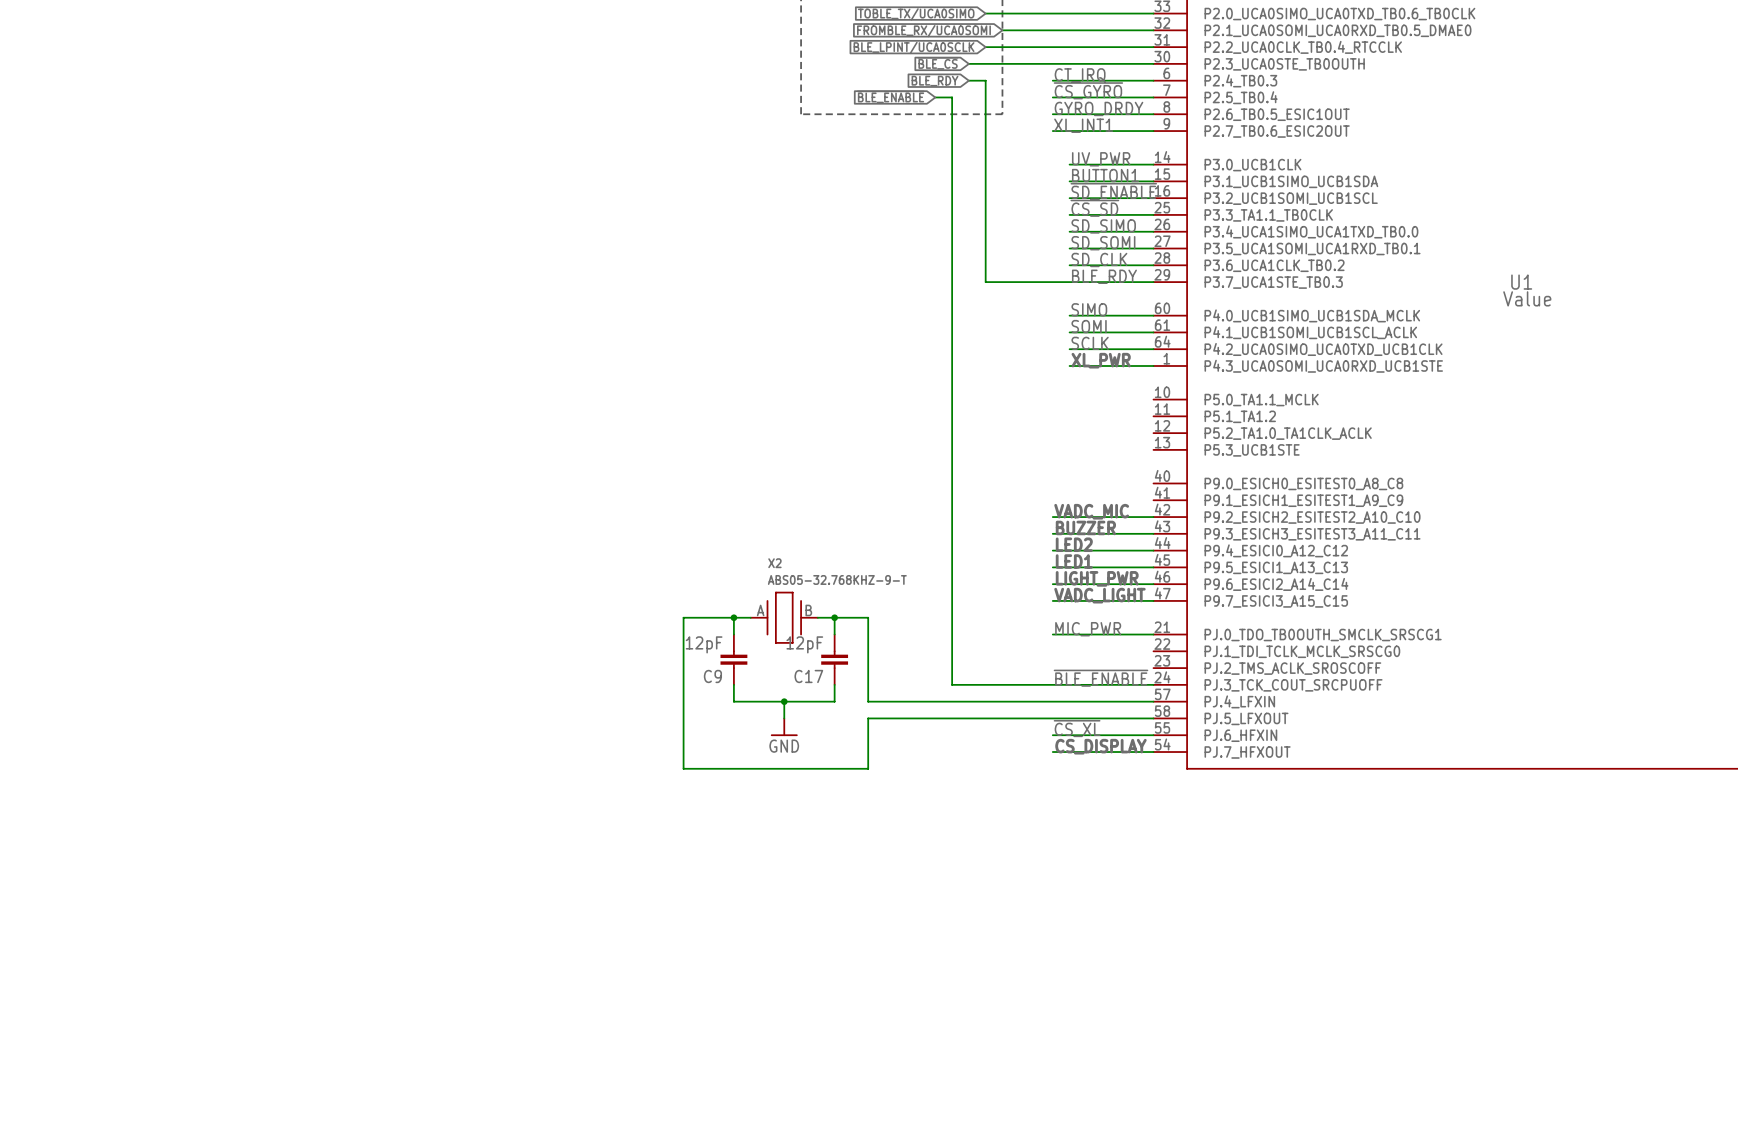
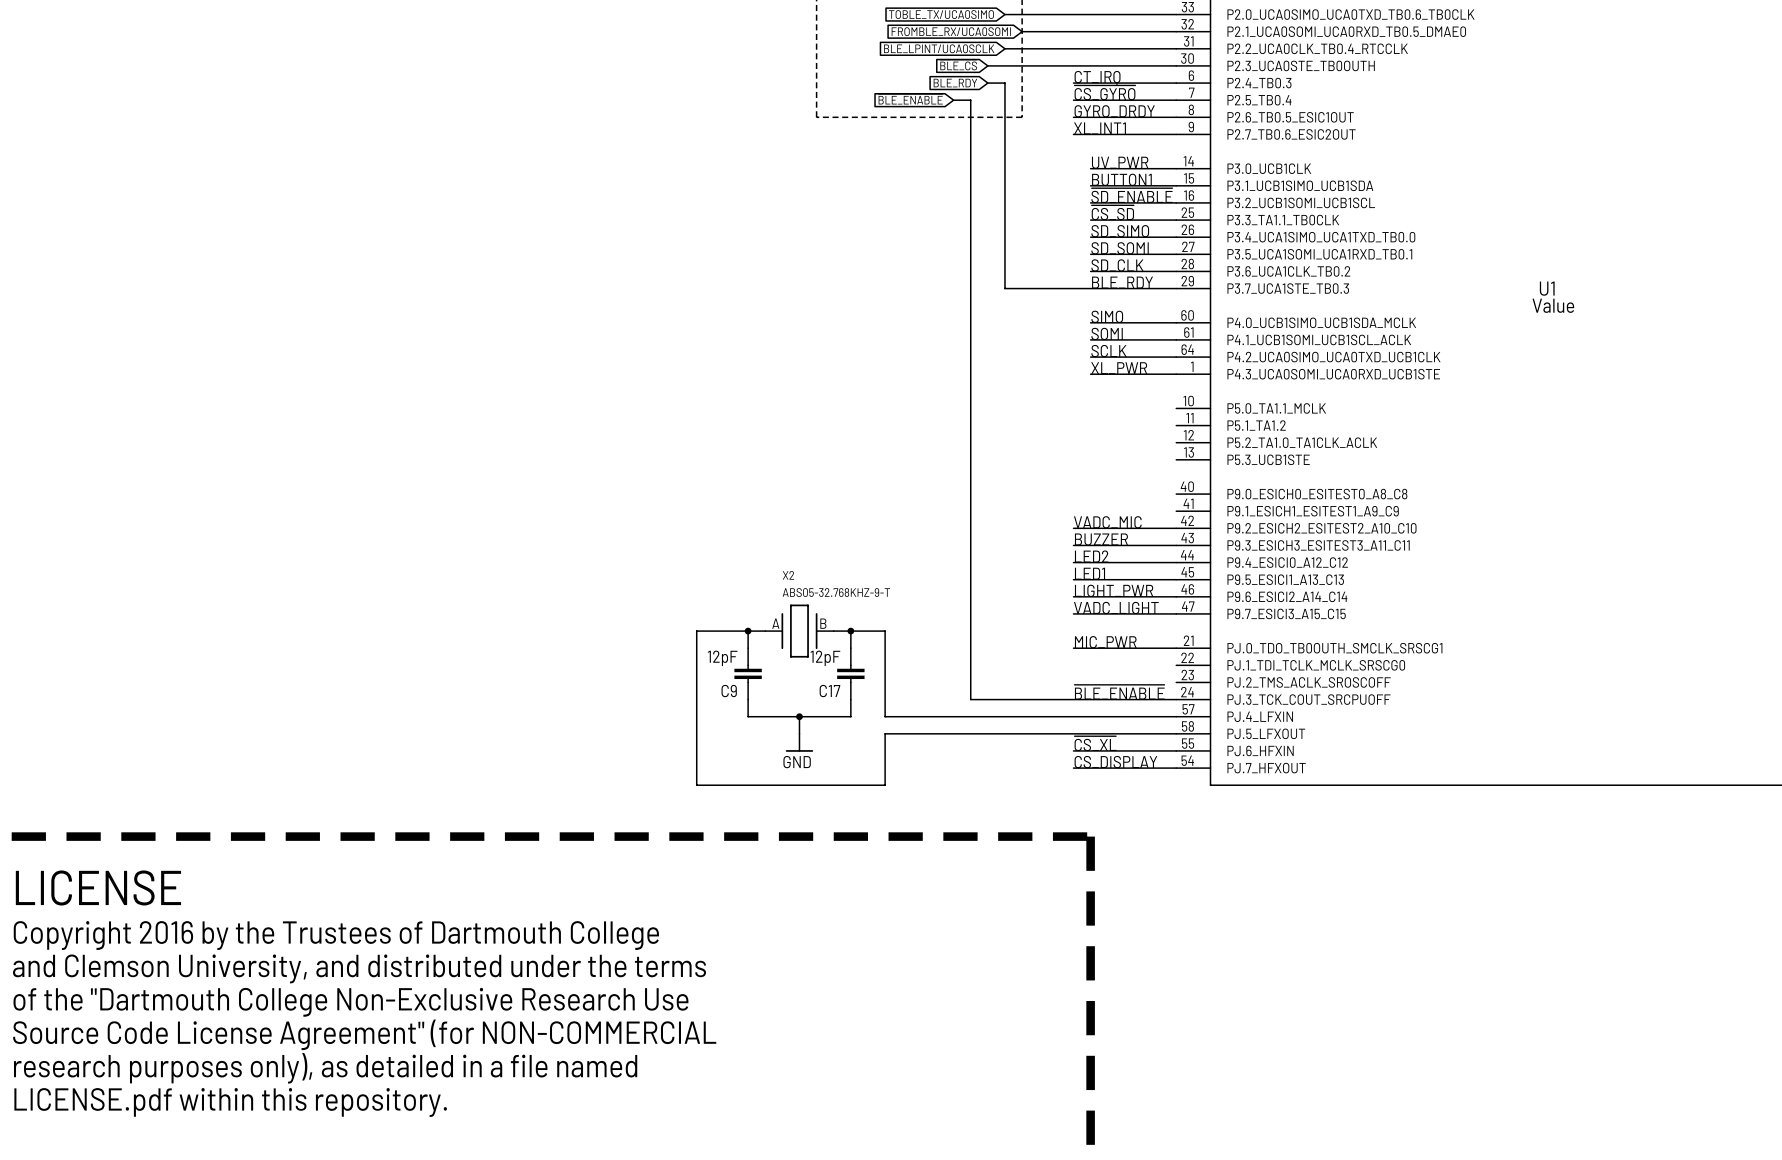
line: none -> (11, 836) (1090, 836) (1090, 1144)
text: none -> LICENSE (98, 887)
text: none -> Copyright 2016 by the Trustees of Dartmouth College (336, 935)
text: none -> and Clemson University, and distributed under the terms (359, 968)
text: none -> of the "Dartmouth College Non-Exclusive Research Use (350, 1002)
text: none -> Source Code License Agreement" (for NON-COMMERCIAL (364, 1034)
text: none -> research purposes only), as detailed in a file named (325, 1068)
text: none -> LICENSE.pdf within this repository. (230, 1102)

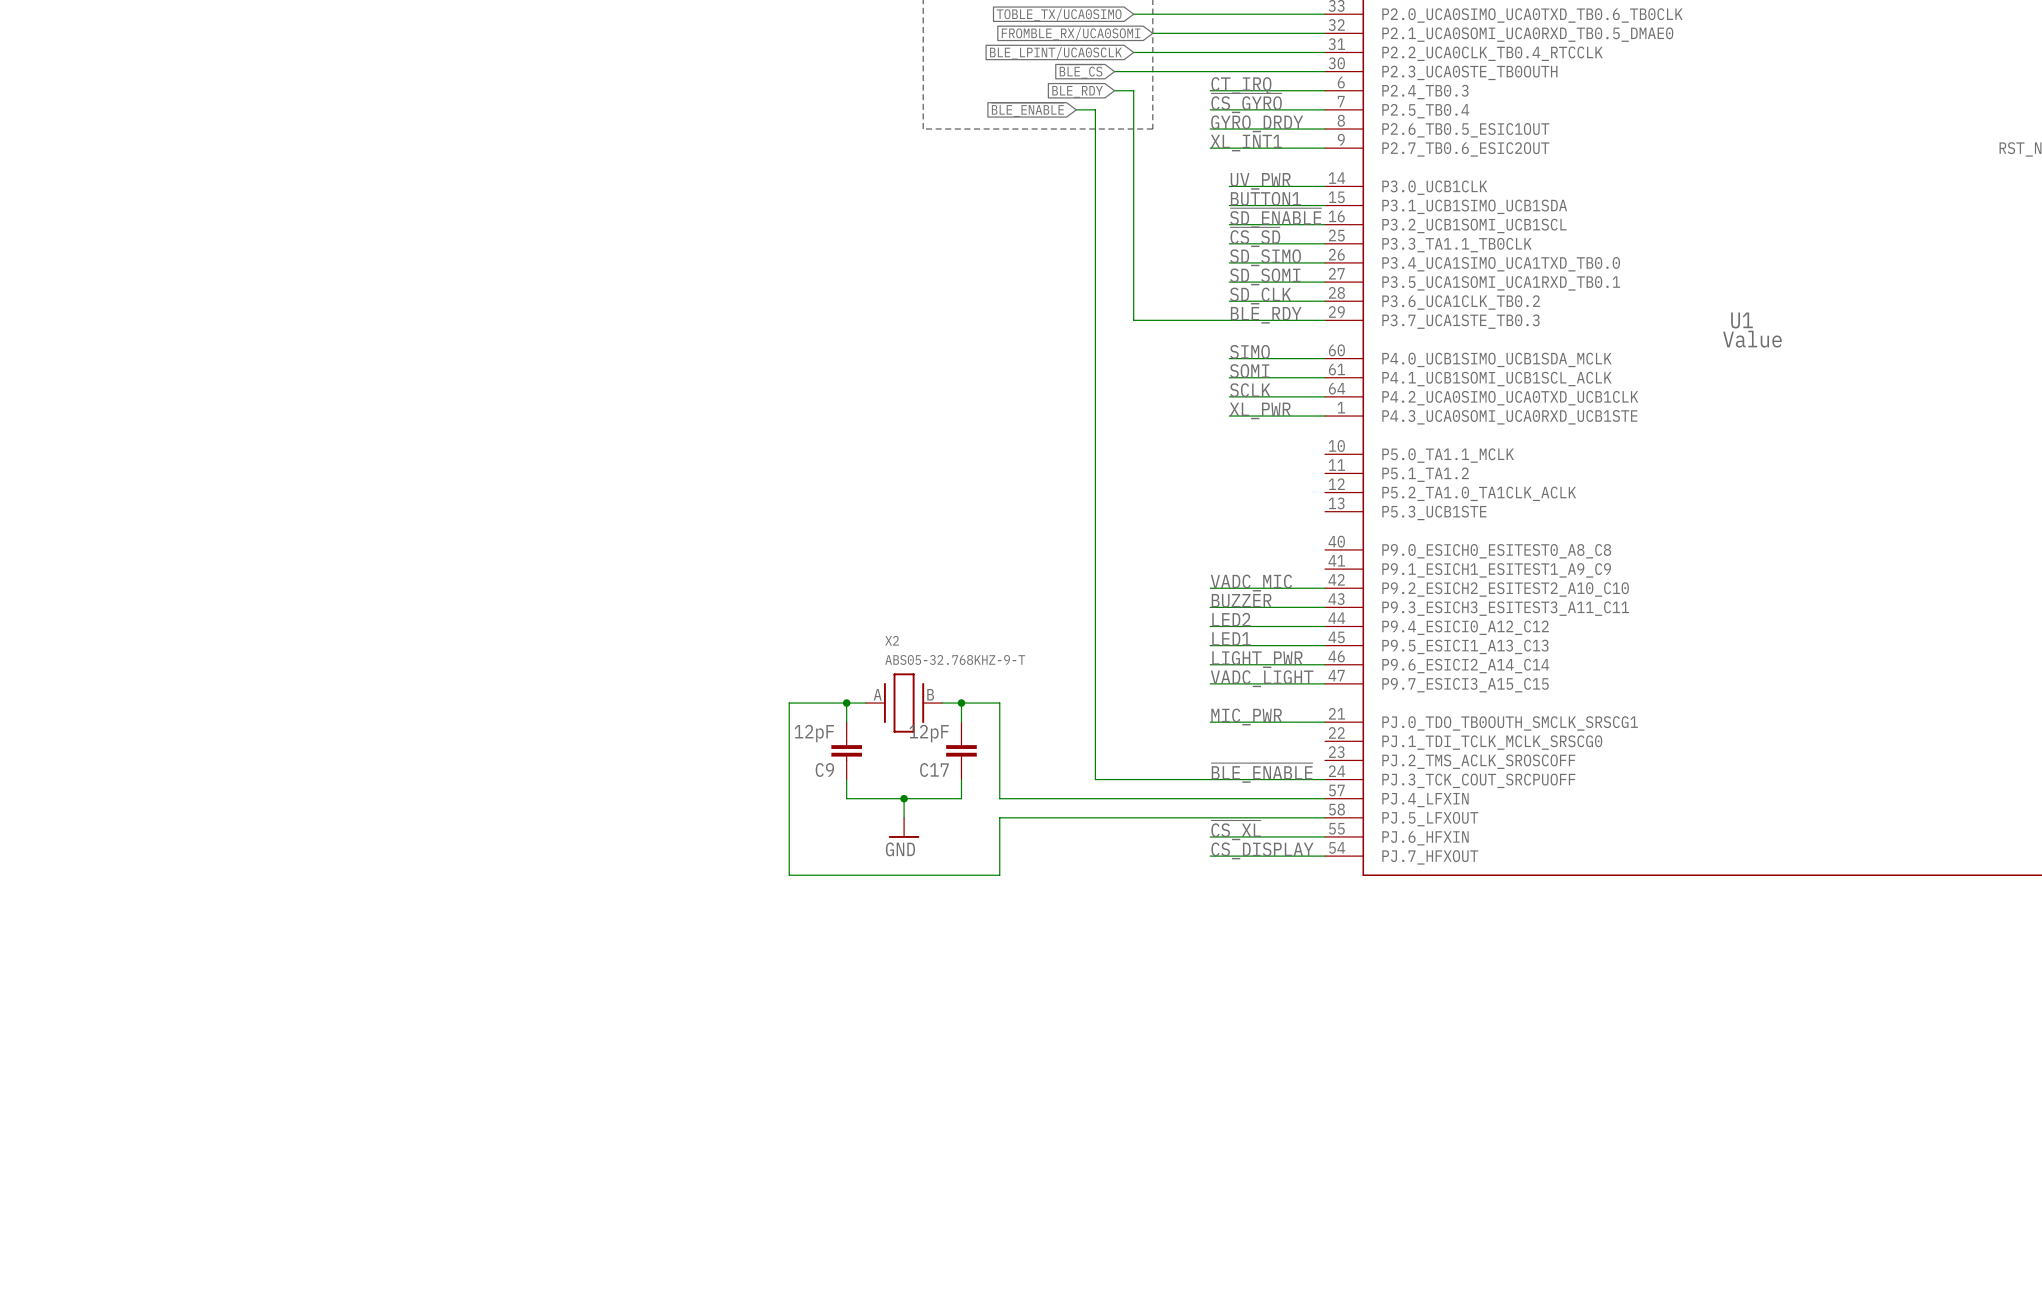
line: (11, 836) (1090, 836) (1090, 1144) -> none
text: LICENSE (98, 887) -> none
text: Copyright 2016 by the Trustees of Dartmouth College (336, 935) -> none
text: and Clemson University, and distributed under the terms (359, 968) -> none
text: of the "Dartmouth College Non-Exclusive Research Use (350, 1002) -> none
text: Source Code License Agreement" (for NON-COMMERCIAL (364, 1034) -> none
text: research purposes only), as detailed in a file named (325, 1068) -> none
text: LICENSE.pdf within this repository. (230, 1102) -> none

